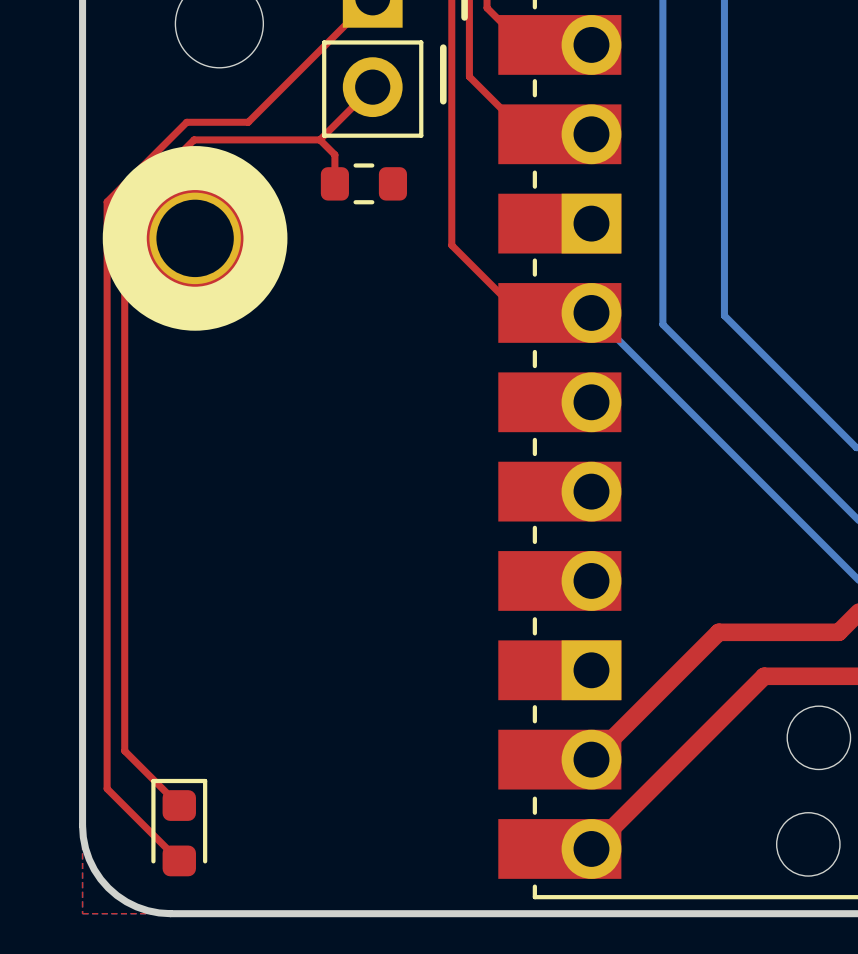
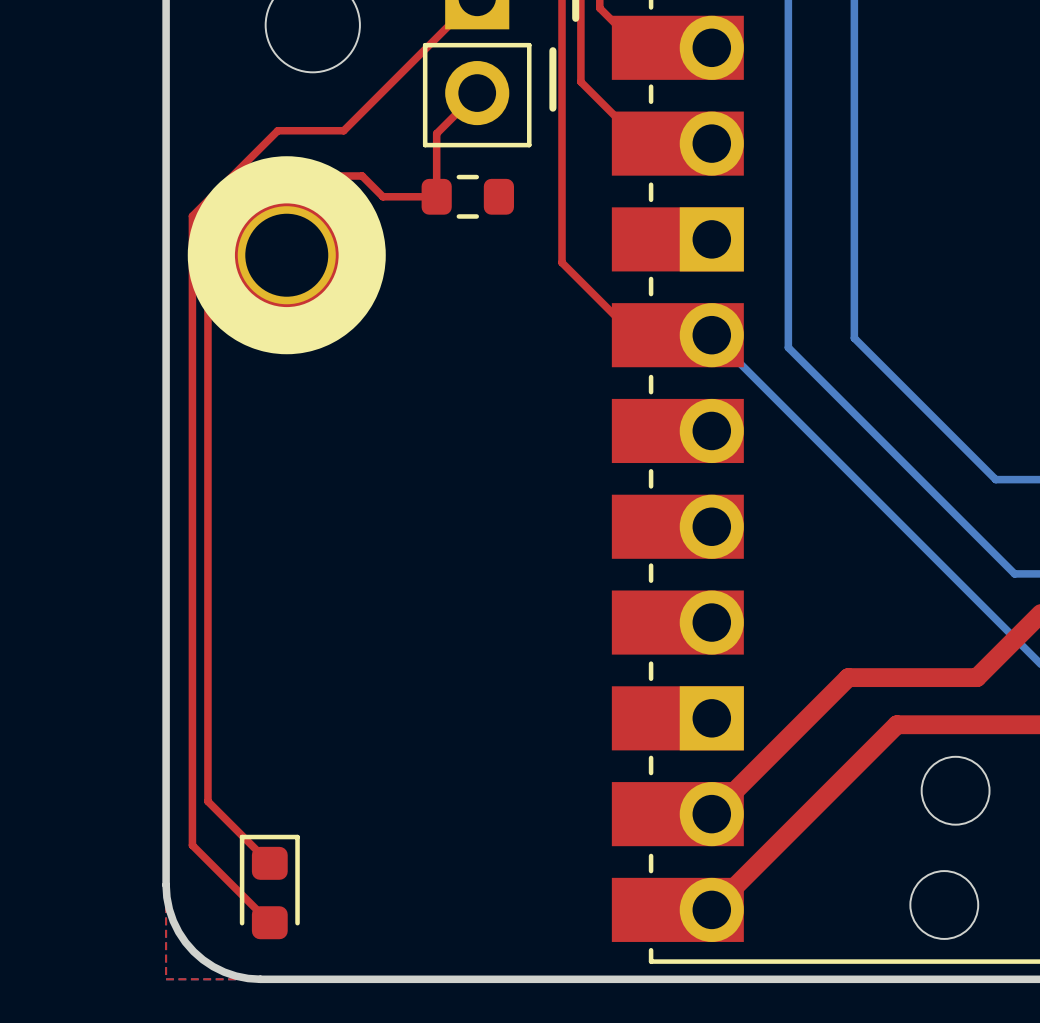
top track: (334, 124) (319, 139) -> (436, 133) (436, 165)
top track: (319, 139) (194, 139) (124, 209) (124, 750) -> (436, 196) (382, 196) (362, 176) (257, 176) (207, 225) (207, 801) (211, 804)
top track: (319, 139) (334, 154) -> none

